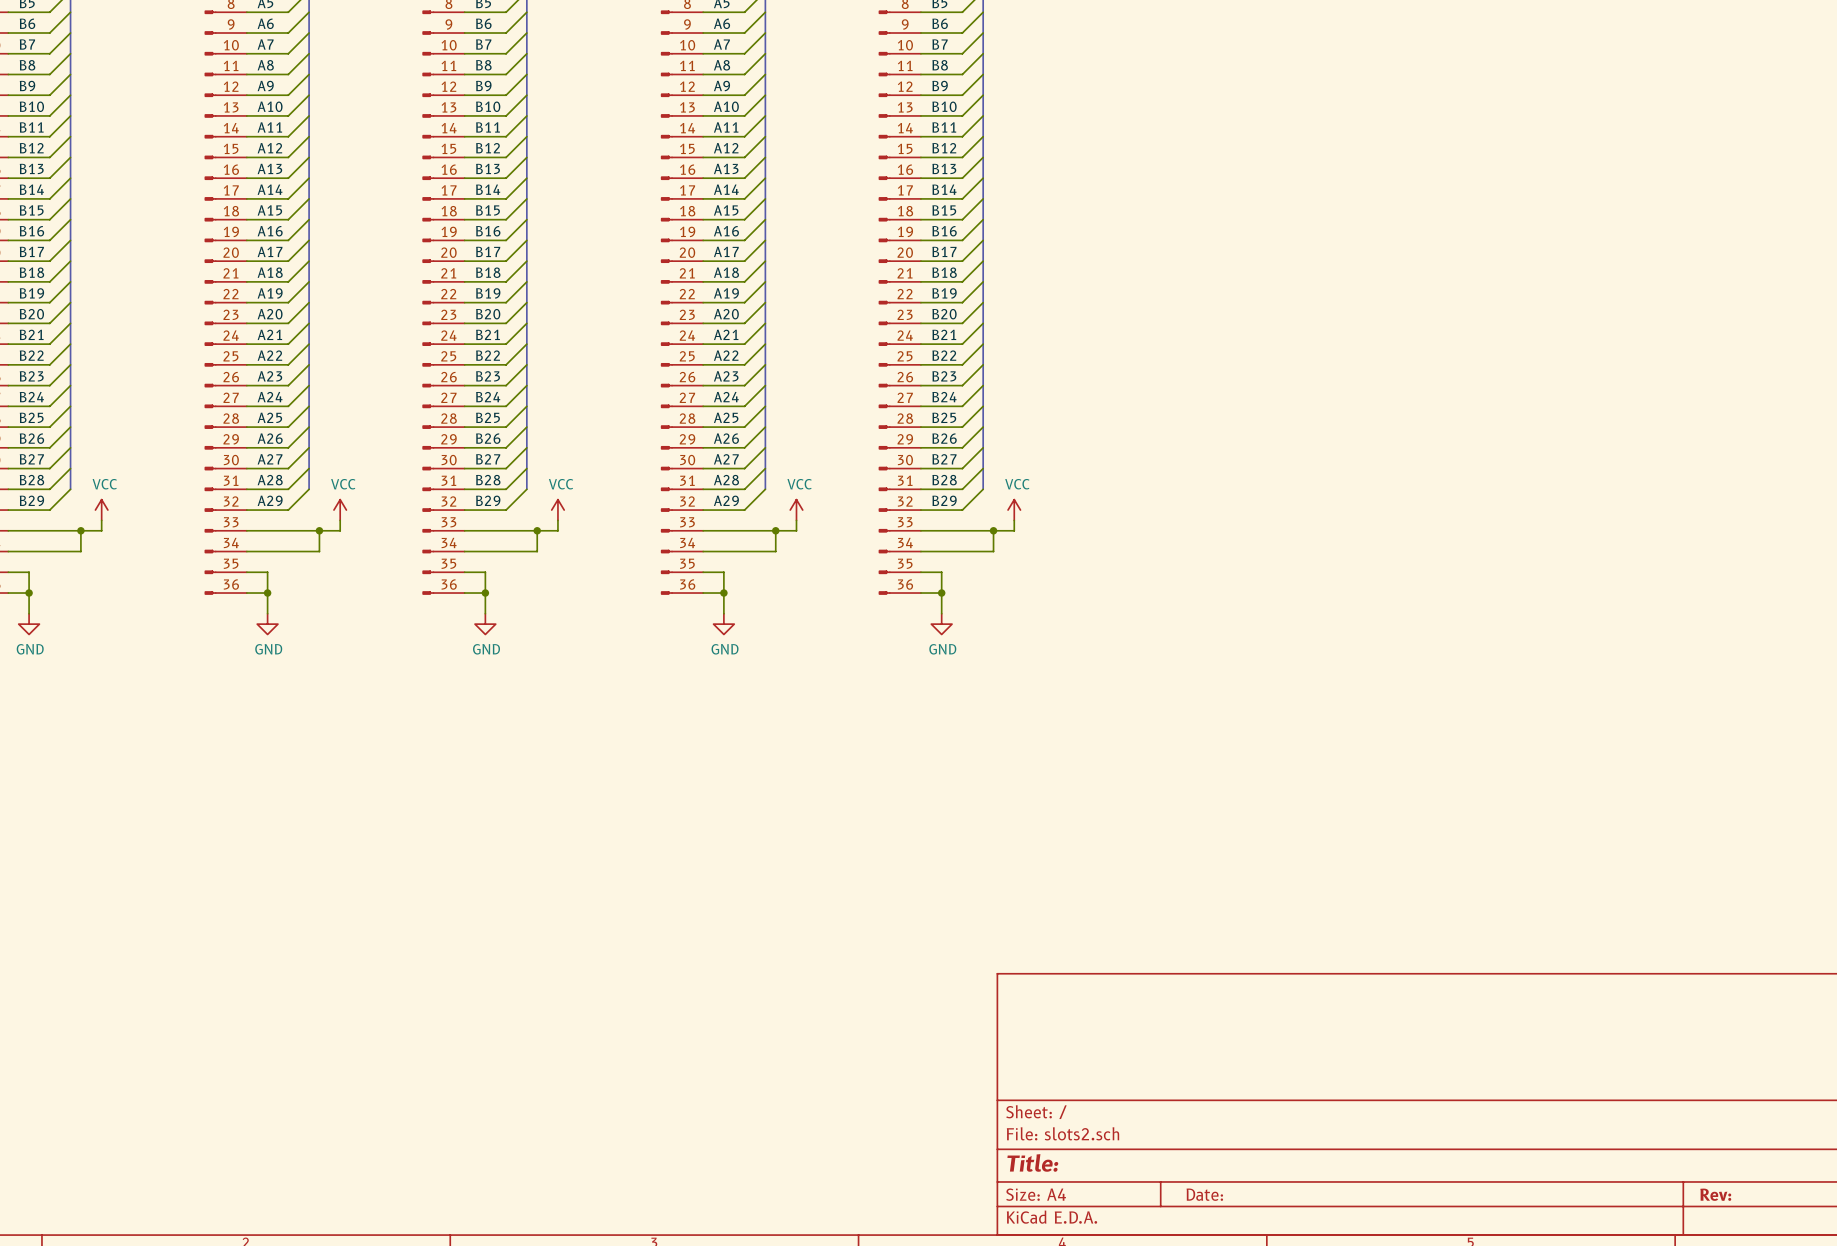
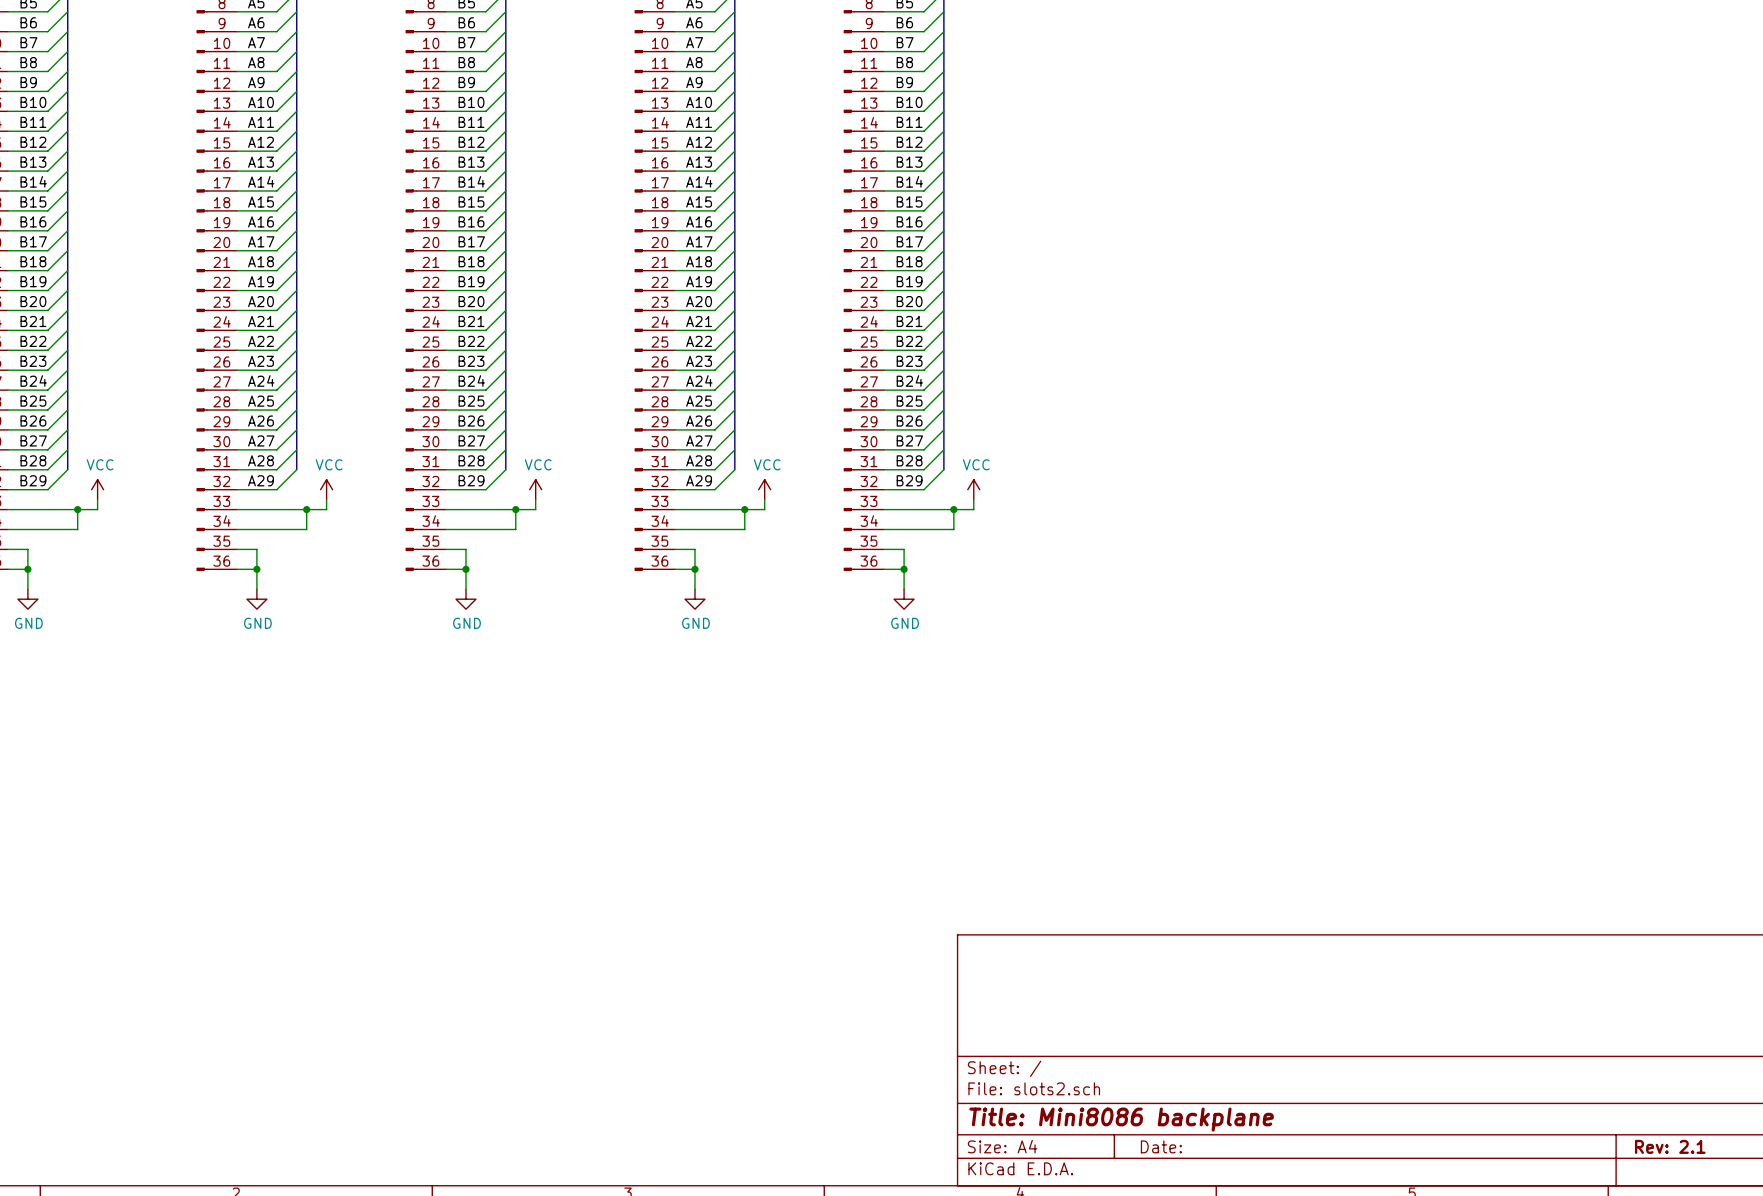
title block: Title: (1032, 1162) -> Title: Mini8086 backplane (1121, 1119)
title block: Rev: (1715, 1194) -> Rev: 2.1 (1670, 1146)

